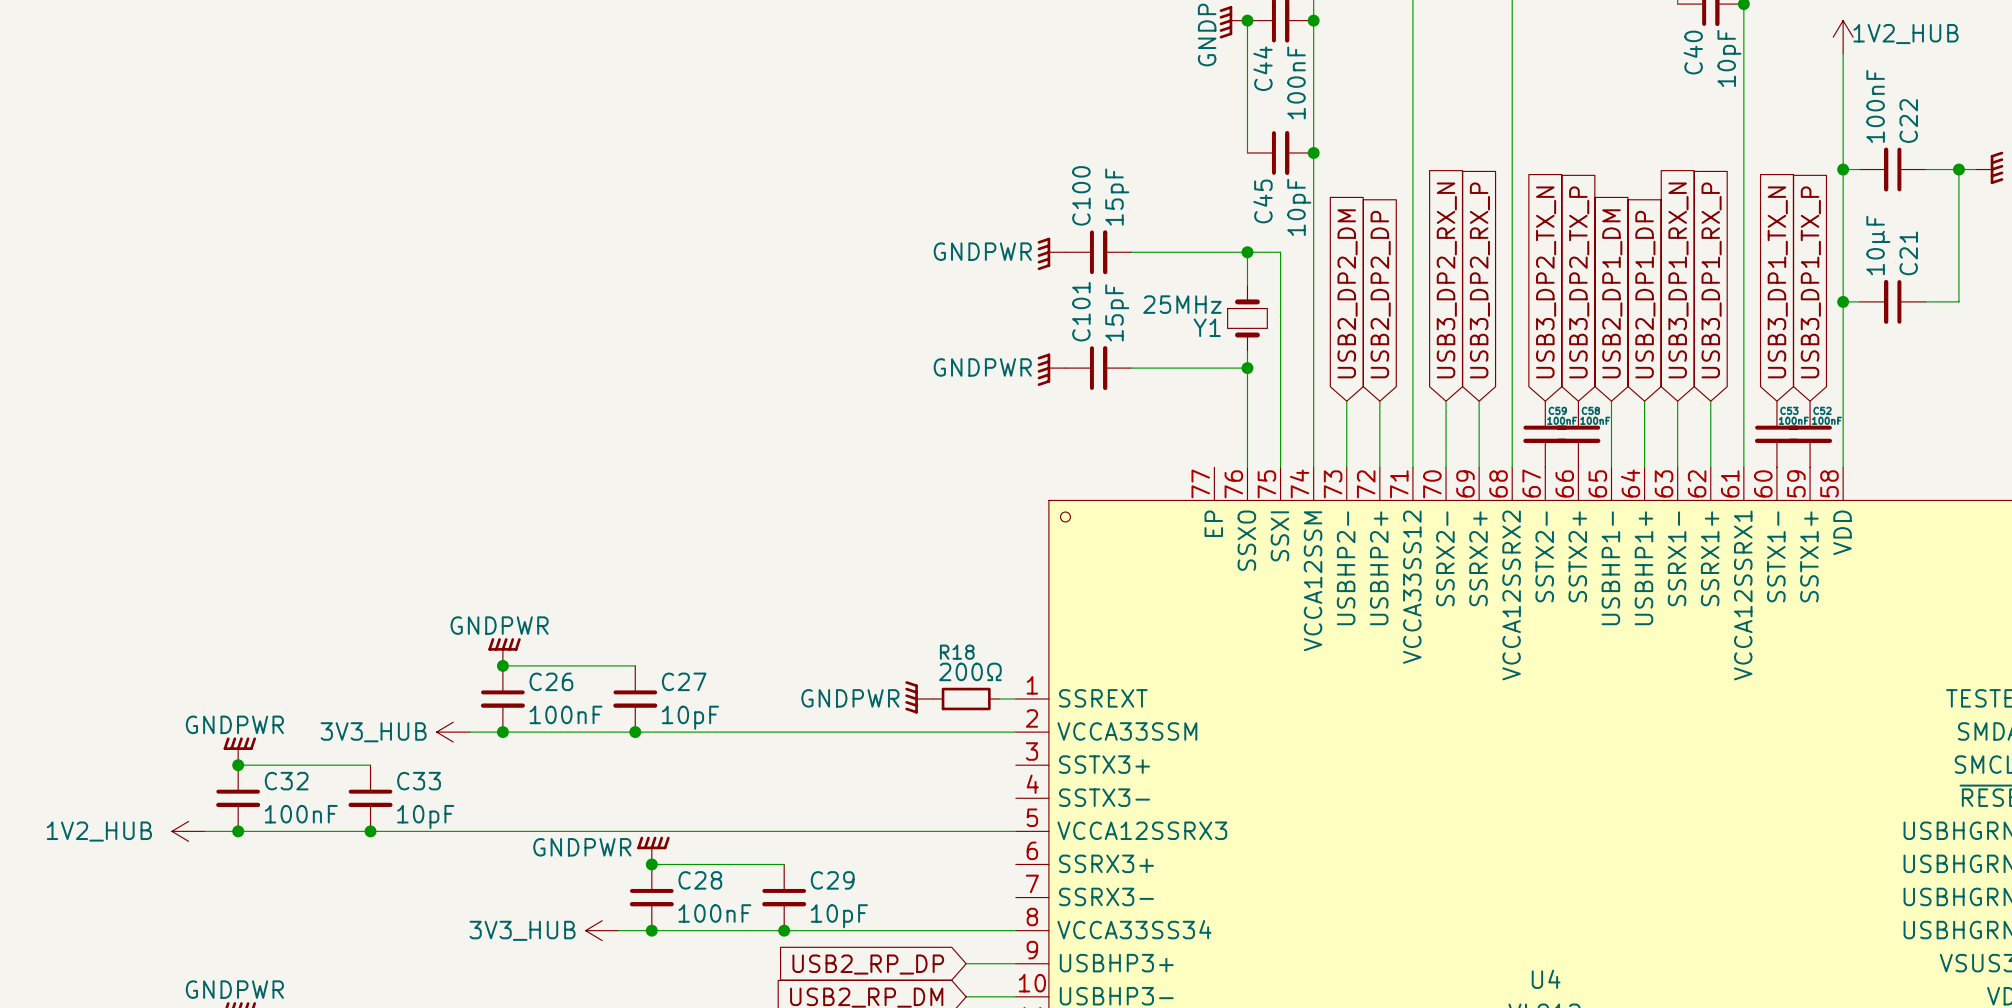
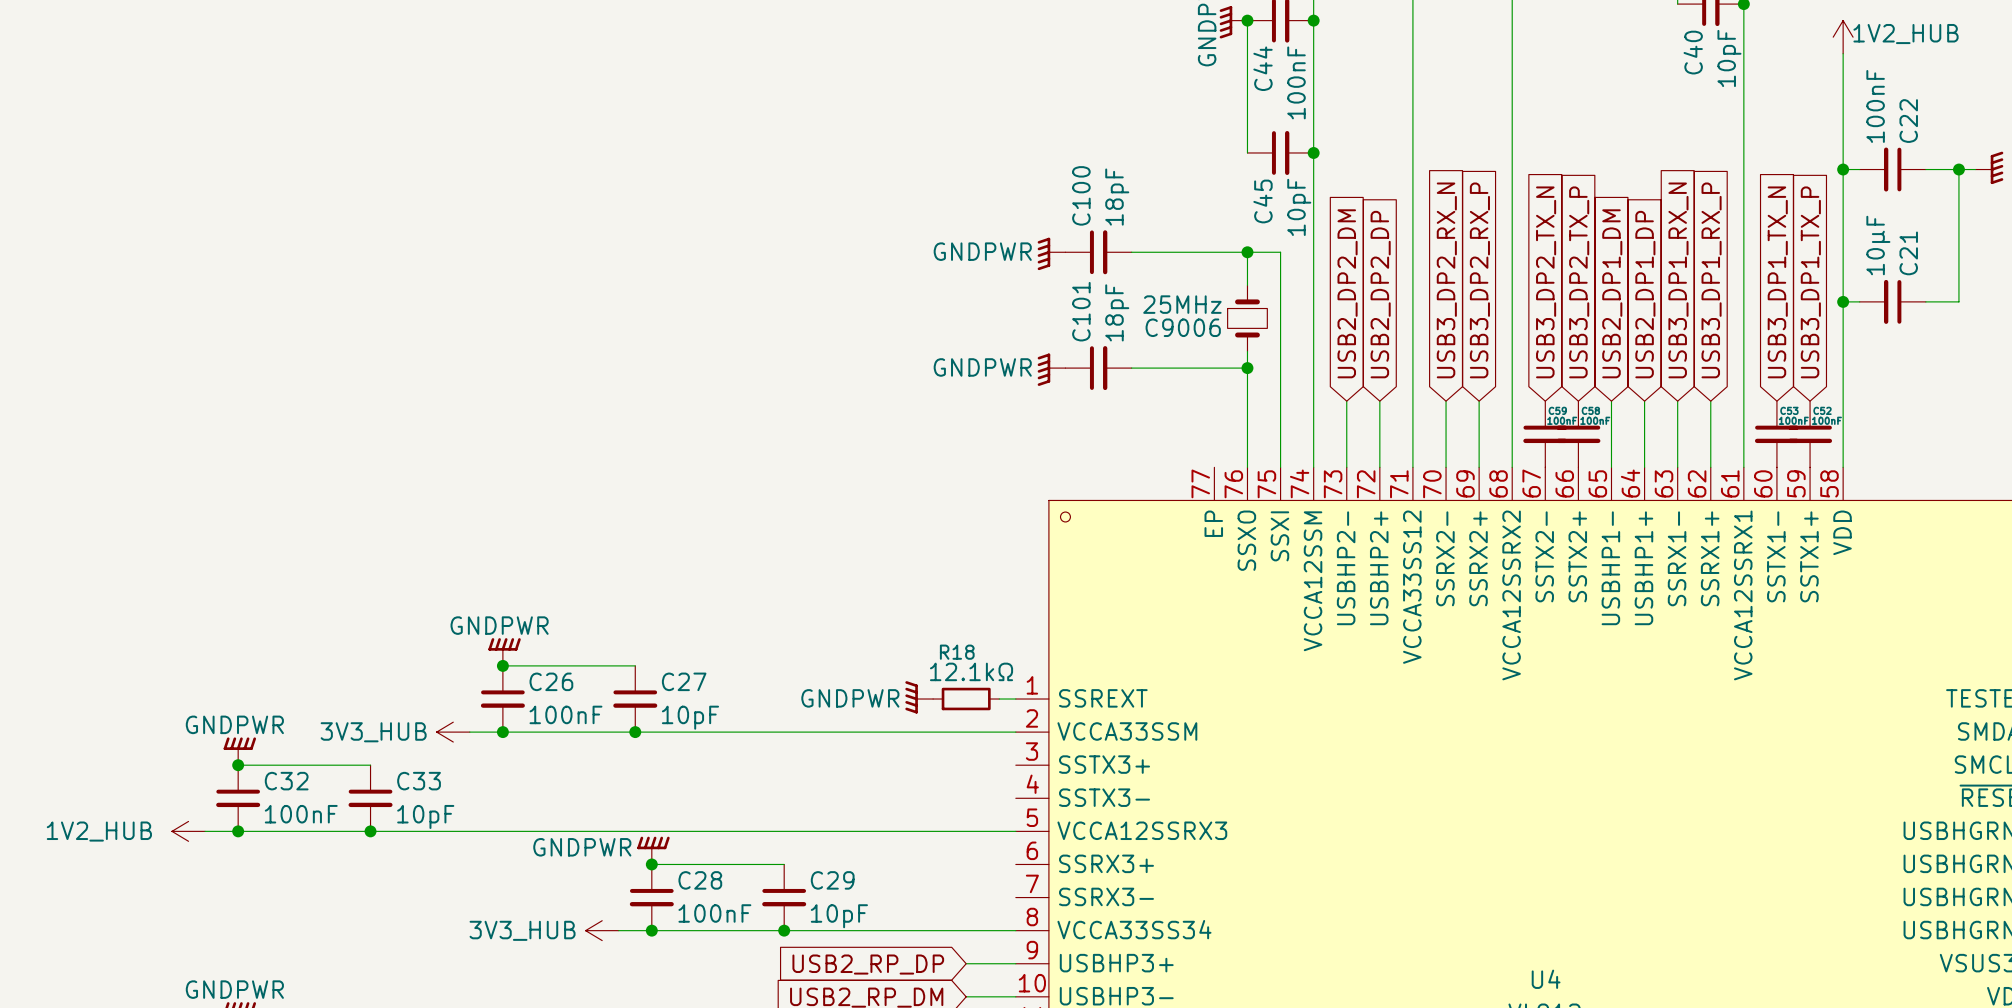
C100 value: 15pF (1117, 197) -> 18pF (1117, 197)
C101 value: 15pF (1117, 312) -> 18pF (1117, 312)
Y1 name: Y1 (1207, 327) -> C9006 (1183, 327)
R18 value: 200Ω (970, 671) -> 12.1kΩ (971, 671)

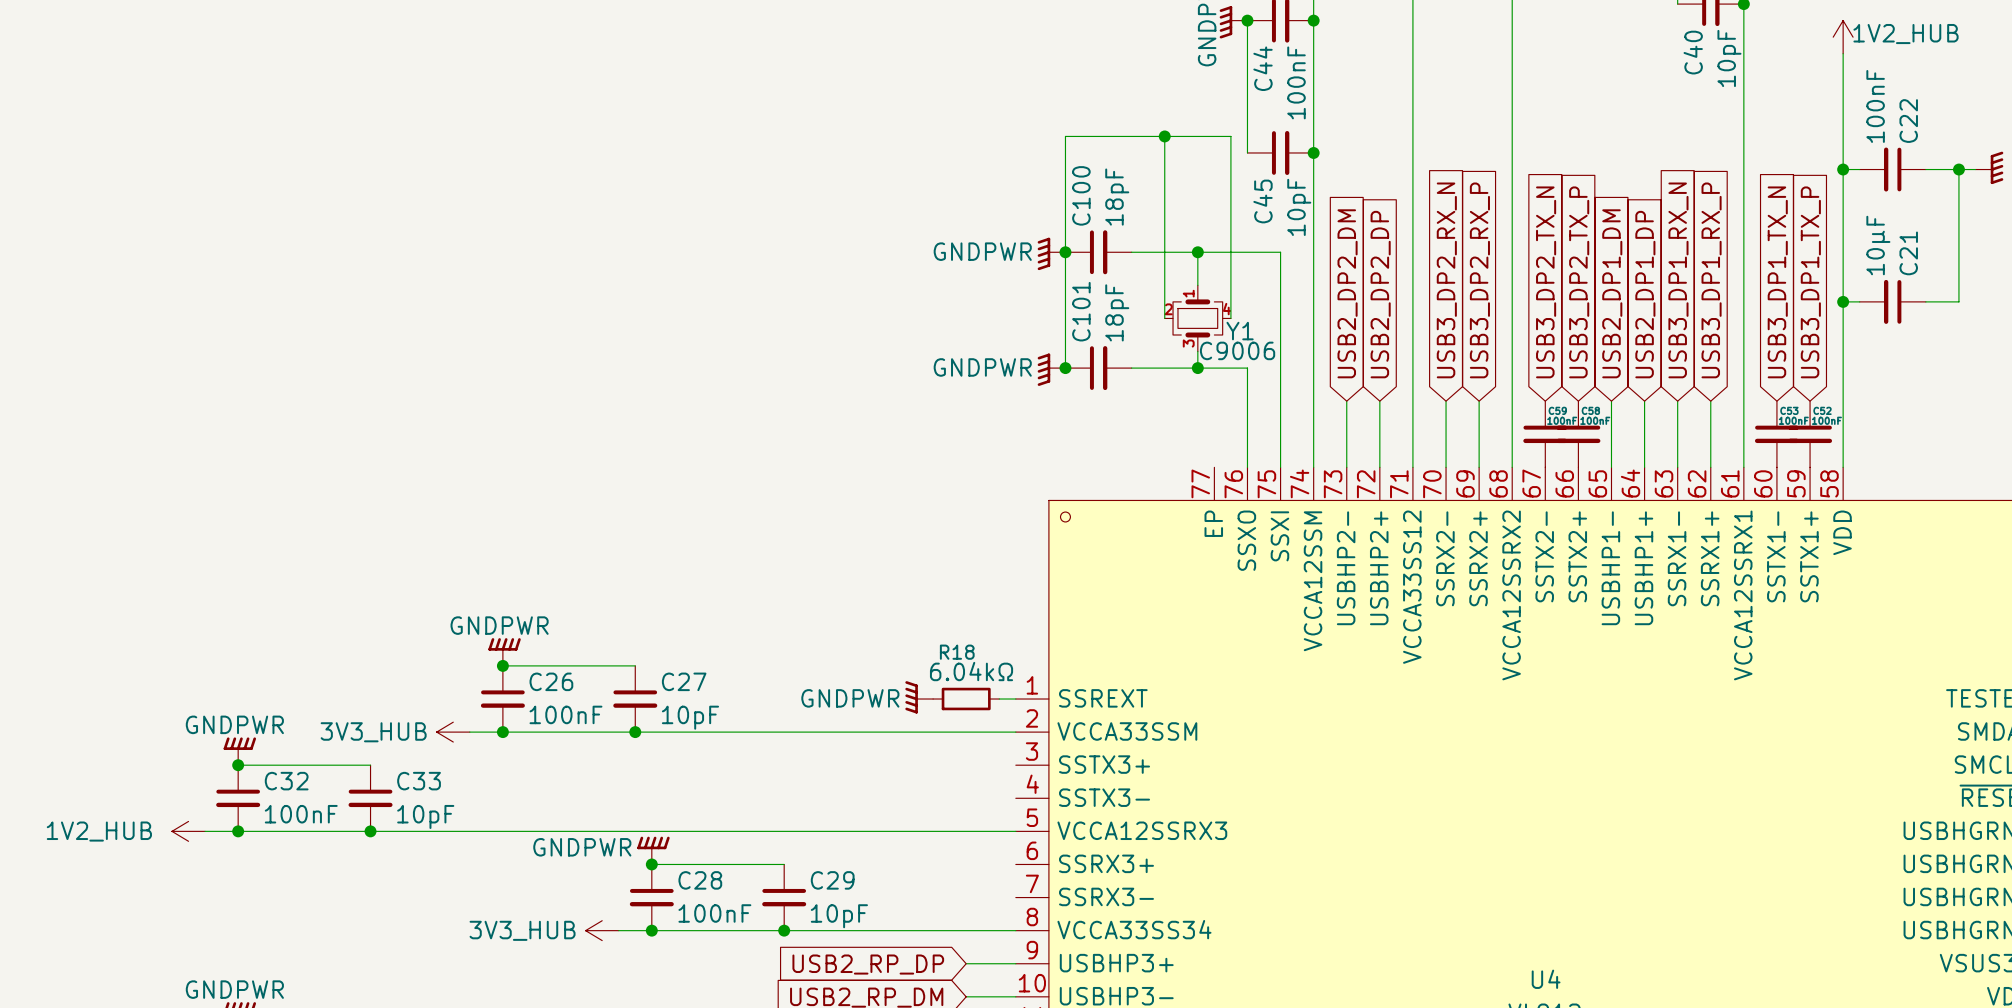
wire: none -> (1164, 136) (1164, 318)
junction: none -> (1164, 136)
junction: none -> (1065, 252)
wire: (1247, 252) (1247, 285) -> (1197, 252) (1197, 285)
junction position: (1247, 252) -> (1197, 252)
Y1: none -> C9006 (1197, 318)
wire: none -> (1230, 318) (1230, 136) (1065, 136) (1065, 368)
C9006: 25MHz (1247, 318) -> none
wire: (1247, 351) (1247, 368) -> (1197, 351) (1197, 368)
junction: none -> (1065, 368)
junction position: (1247, 368) -> (1197, 368)
R18 value: 12.1kΩ (971, 671) -> 6.04kΩ (971, 671)

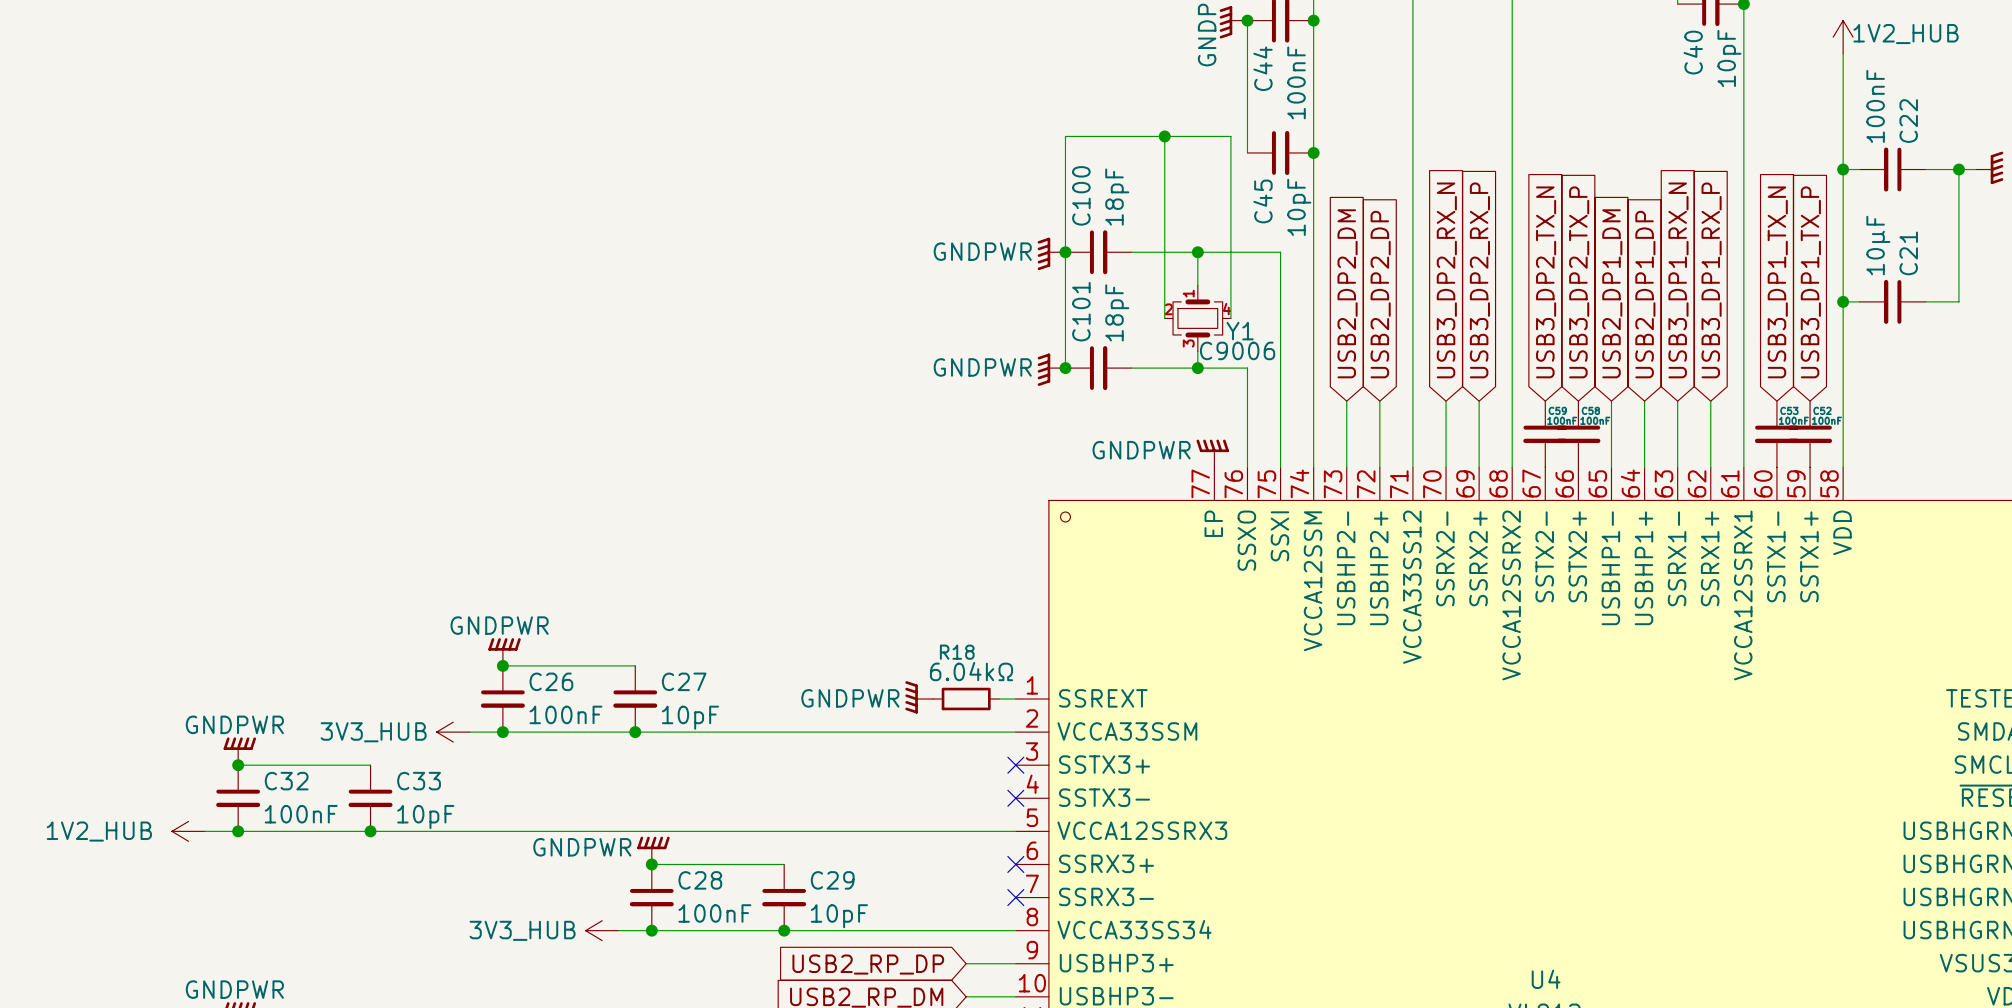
power symbol: none -> GNDPWR (1212, 453)
no-connect mark: none -> (1015, 765)
no-connect mark: none -> (1015, 798)
no-connect mark: none -> (1015, 864)
no-connect mark: none -> (1015, 897)

